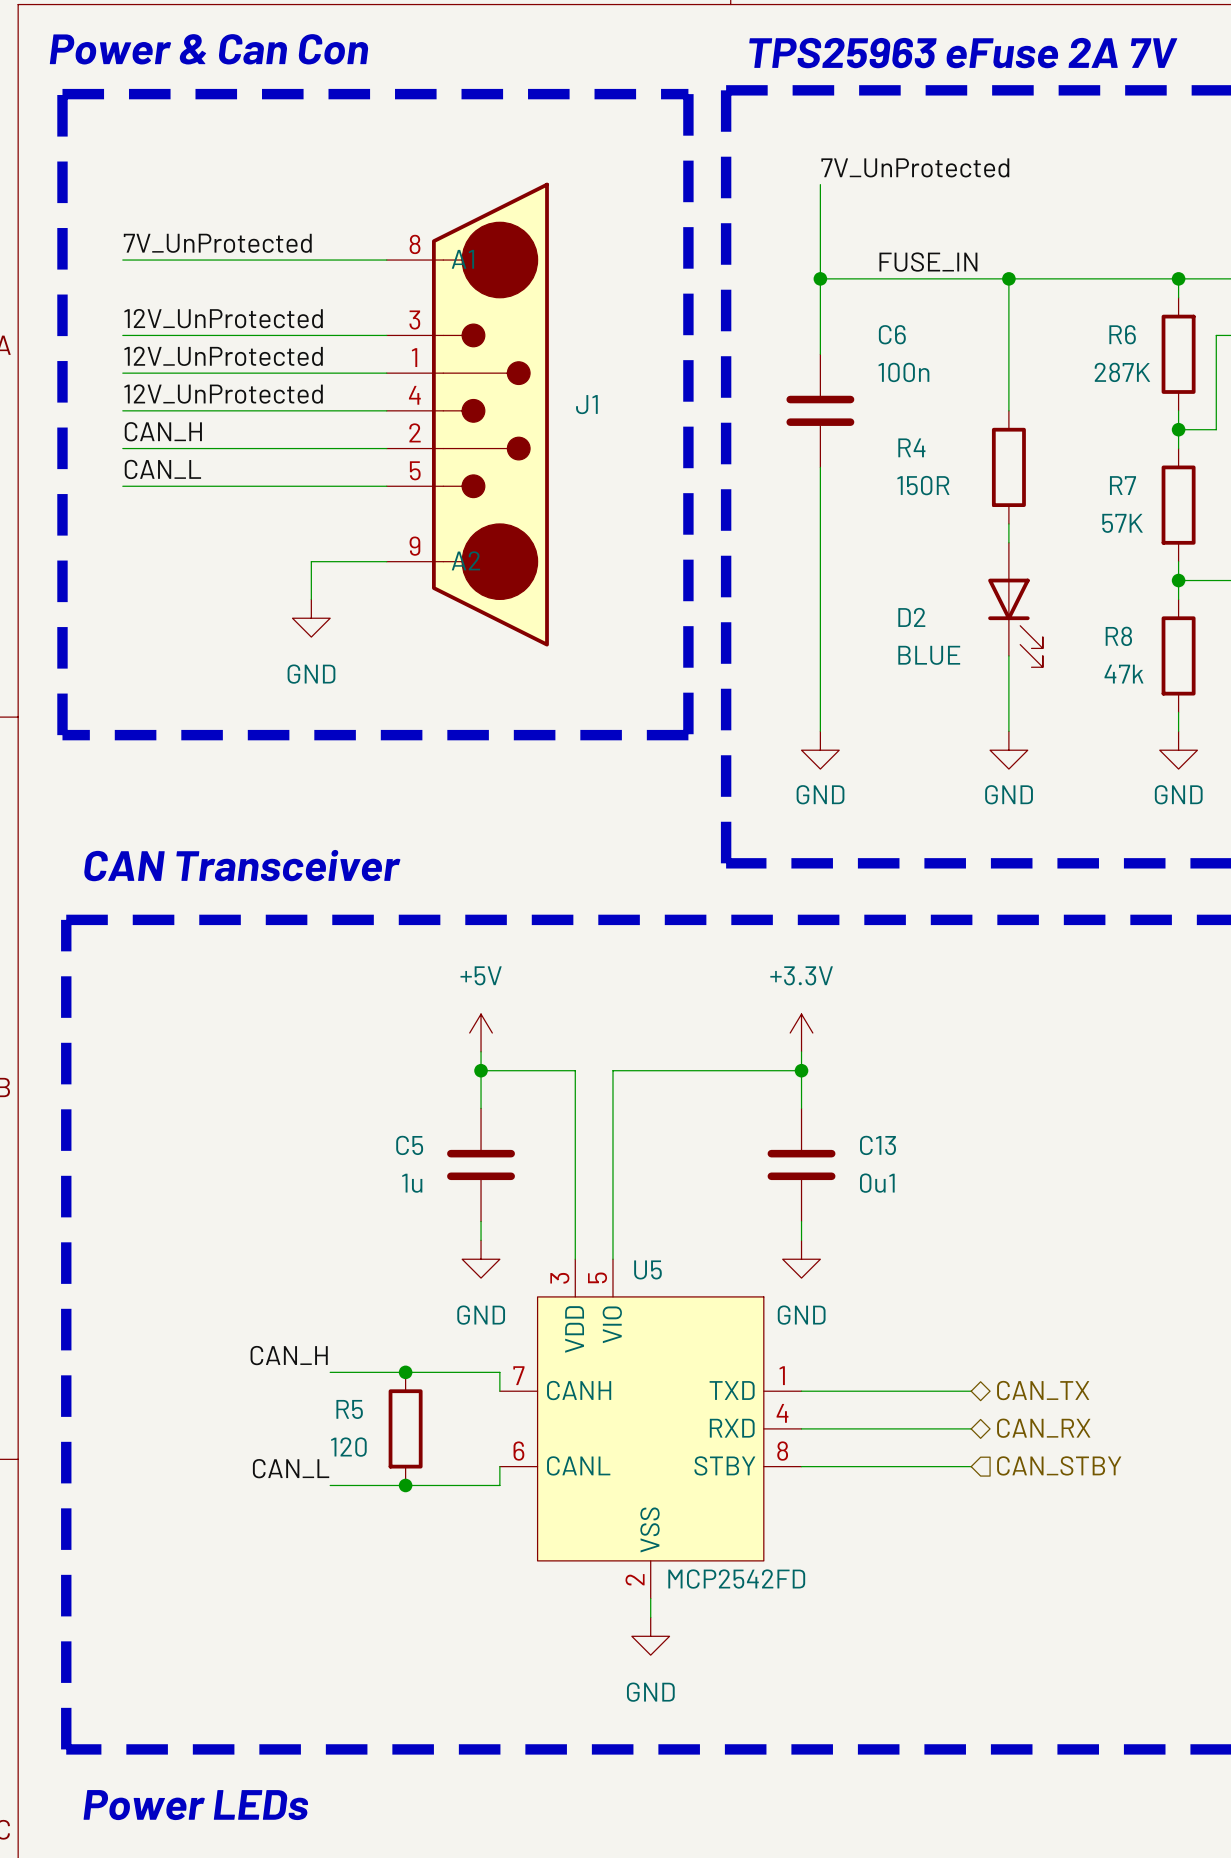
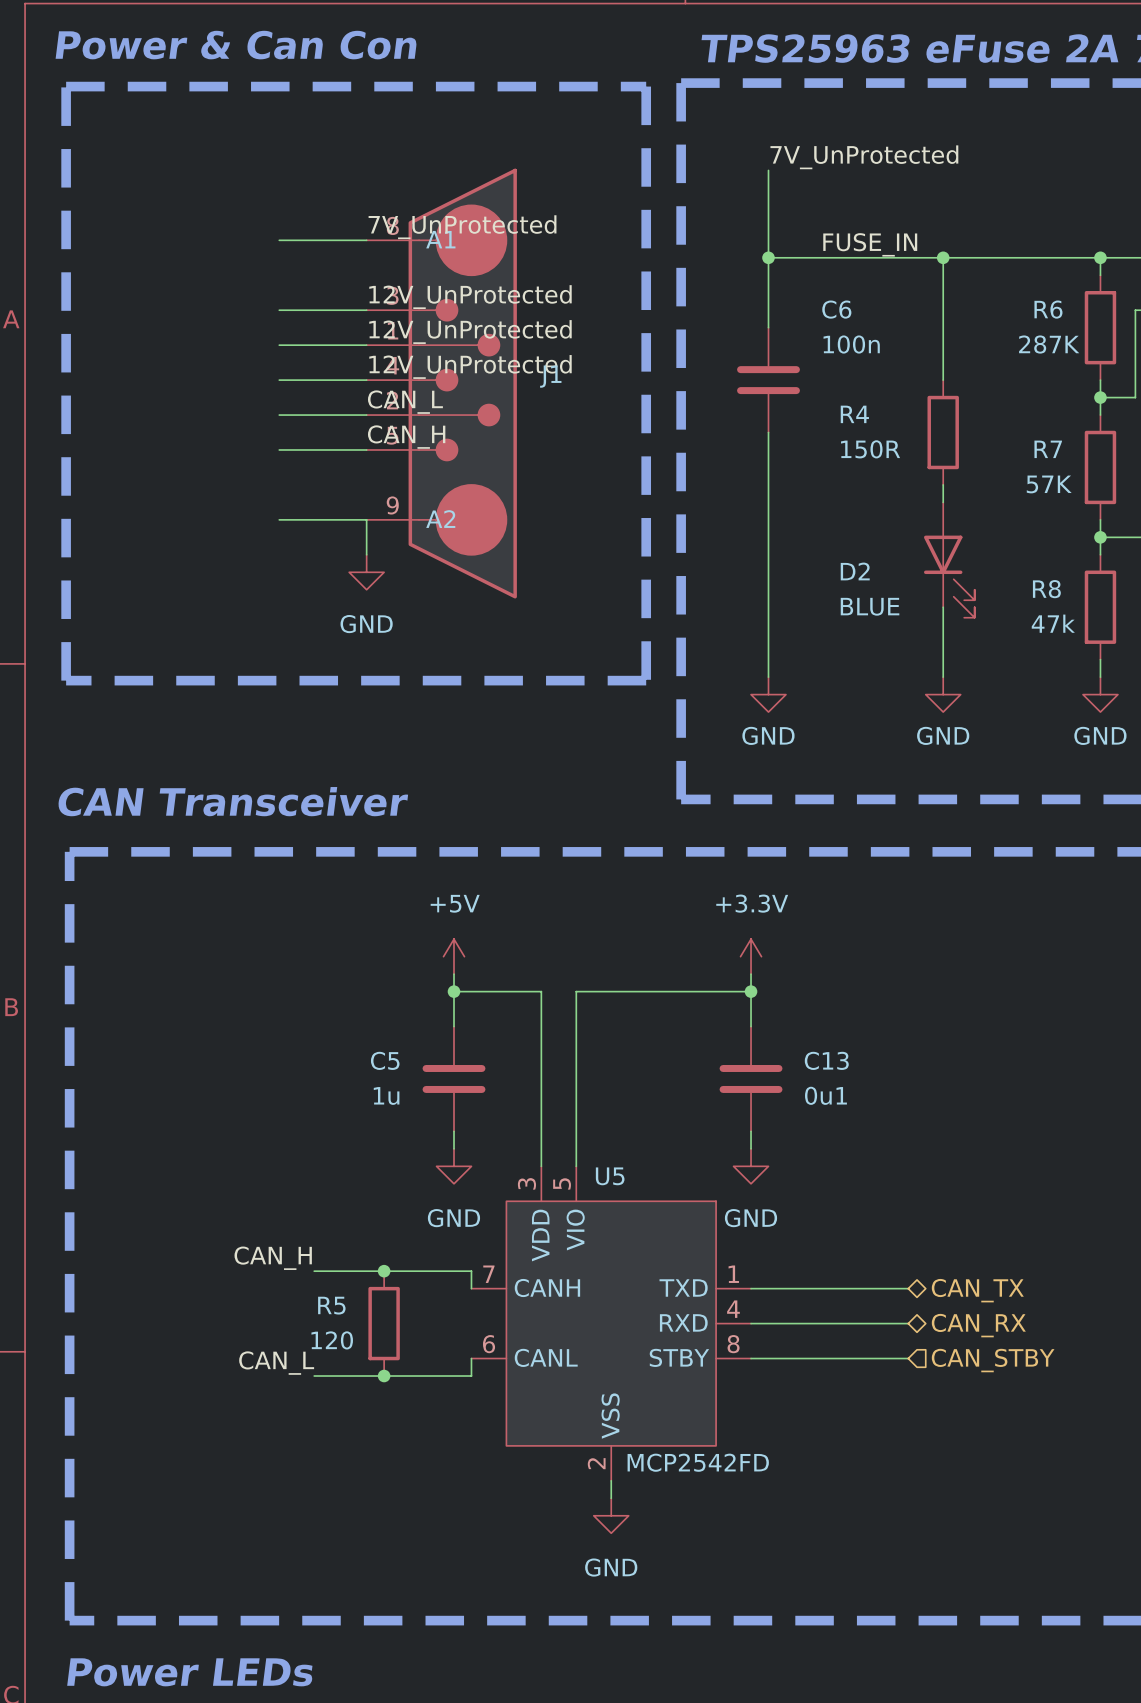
label position: 7V_UnProtected (217, 243) -> 7V_UnProtected (462, 227)
wire: (122, 260) (292, 260) -> none
label: 12V_UnProtected (223, 318) -> none
label: none -> 12V_UnProtected (470, 297)
wire: (122, 335) (292, 335) -> none
label: 12V_UnProtected (223, 356) -> none
label: none -> 12V_UnProtected (470, 332)
wire: (122, 373) (292, 373) -> none
label: 12V_UnProtected (223, 394) -> none
label: none -> 12V_UnProtected (470, 366)
wire: (122, 410) (292, 410) -> none
label position: CAN_H (163, 431) -> CAN_H (406, 437)
wire: (122, 448) (292, 448) -> none
label position: CAN_L (162, 469) -> CAN_L (405, 402)
wire: (122, 486) (292, 486) -> none
wire: (311, 561) (311, 599) -> (296, 519) (279, 519)
wire: none -> (366, 519) (366, 554)
power symbol position: GND (311, 618) -> GND (366, 572)

